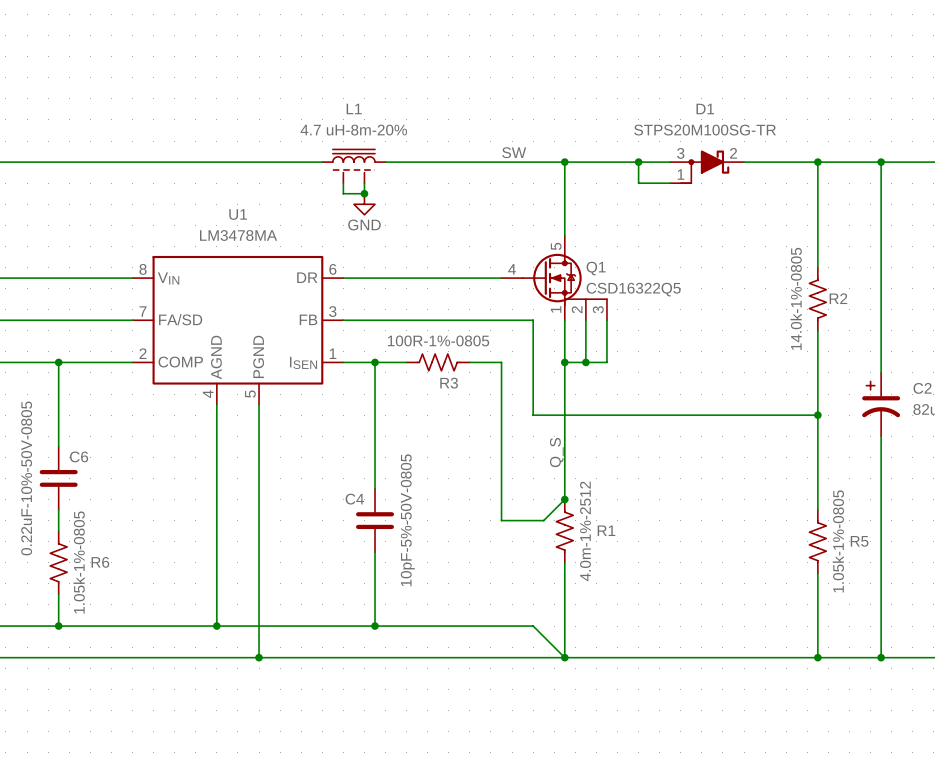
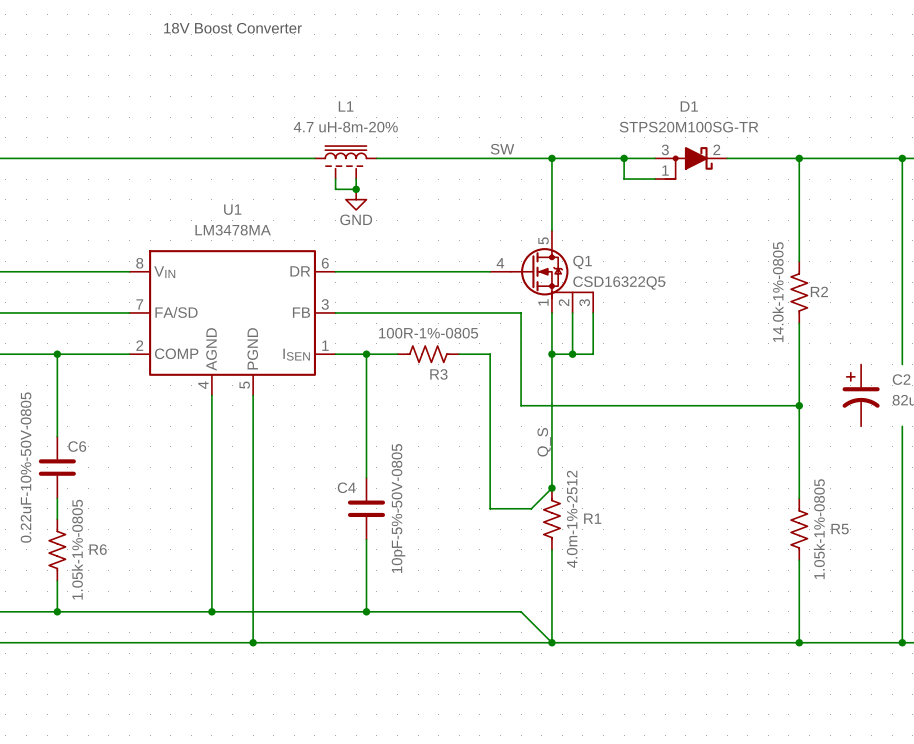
text: none -> 18V Boost Converter (232, 28)
wire: (881, 162) (881, 372) -> (902, 158) (902, 364)
junction position: (881, 162) -> (902, 158)
wire: (881, 436) (881, 657) -> (902, 426) (902, 642)
junction position: (881, 657) -> (902, 642)

